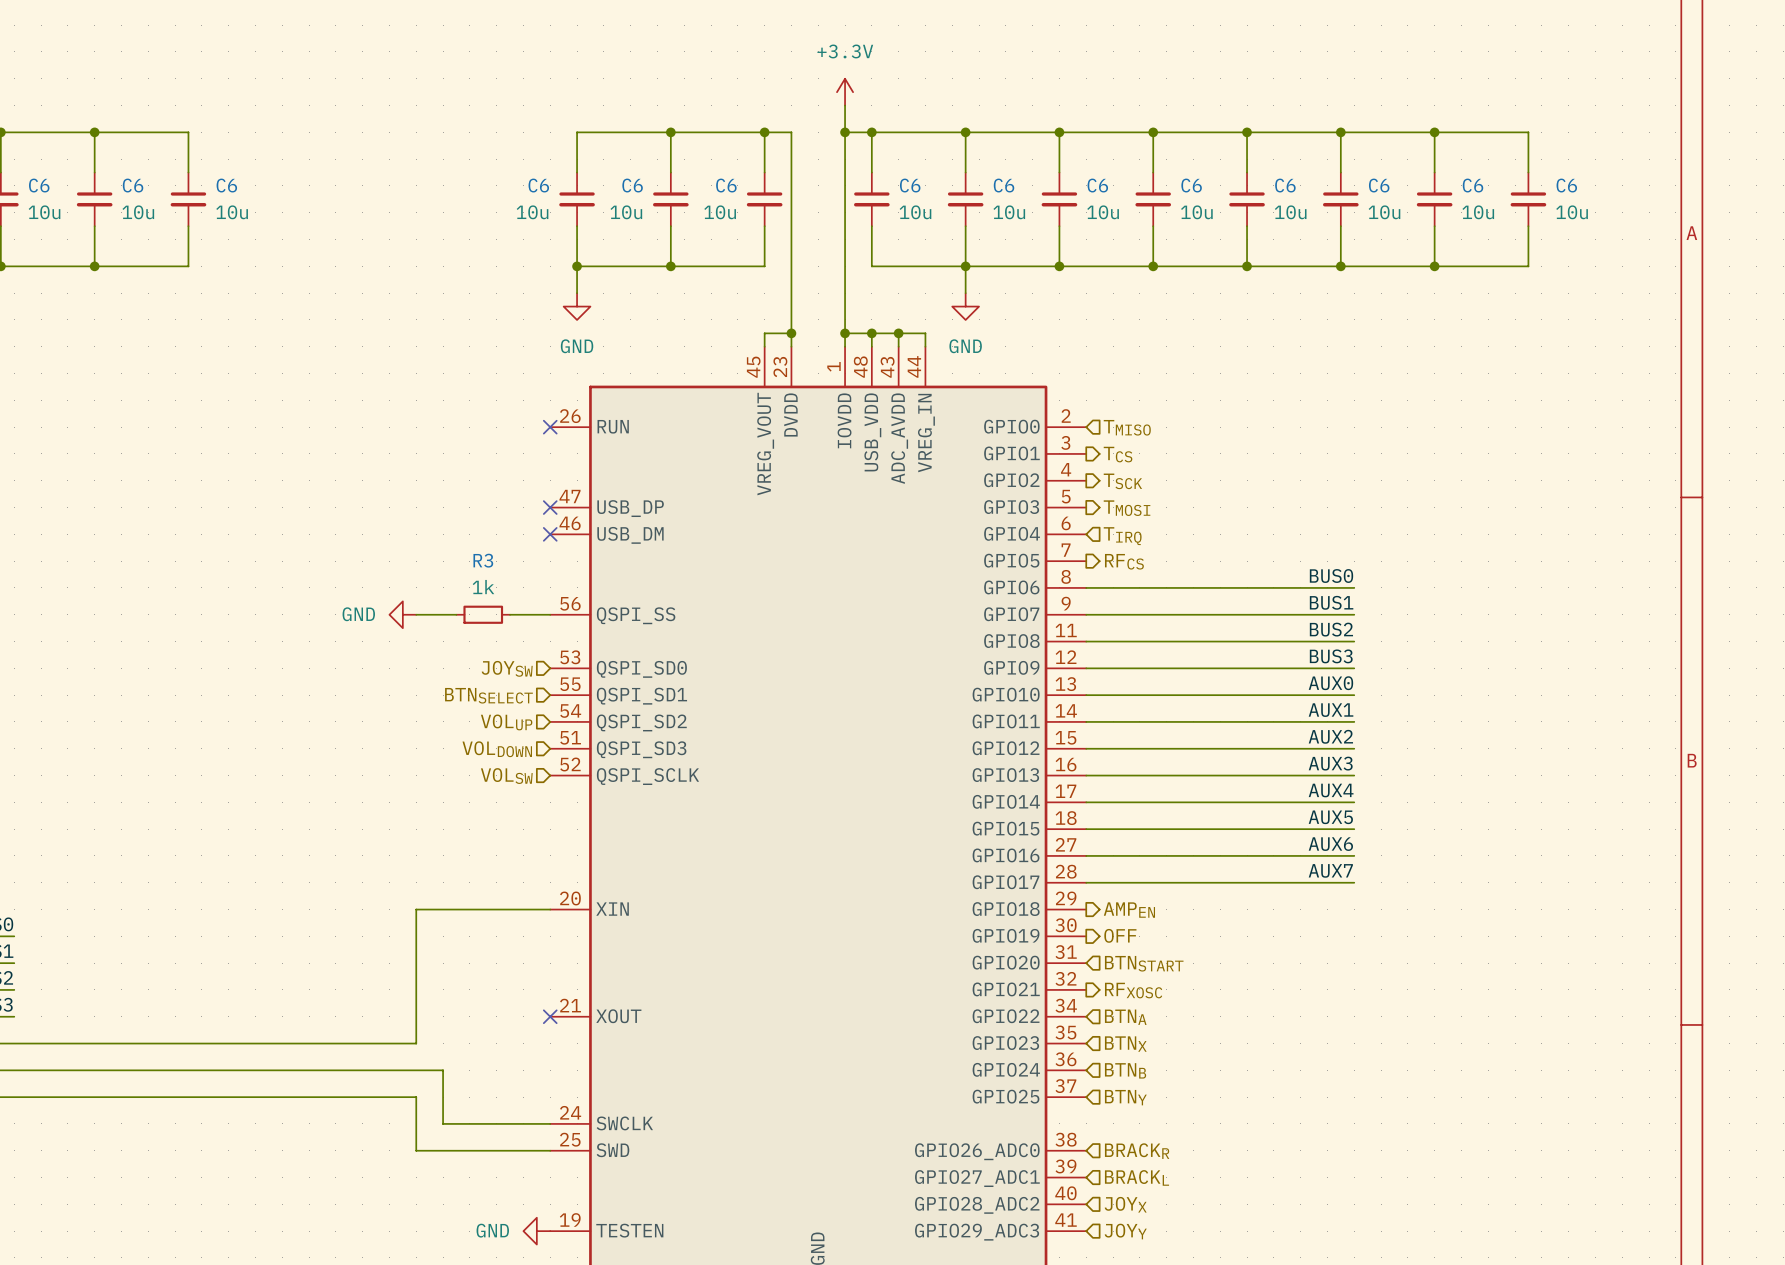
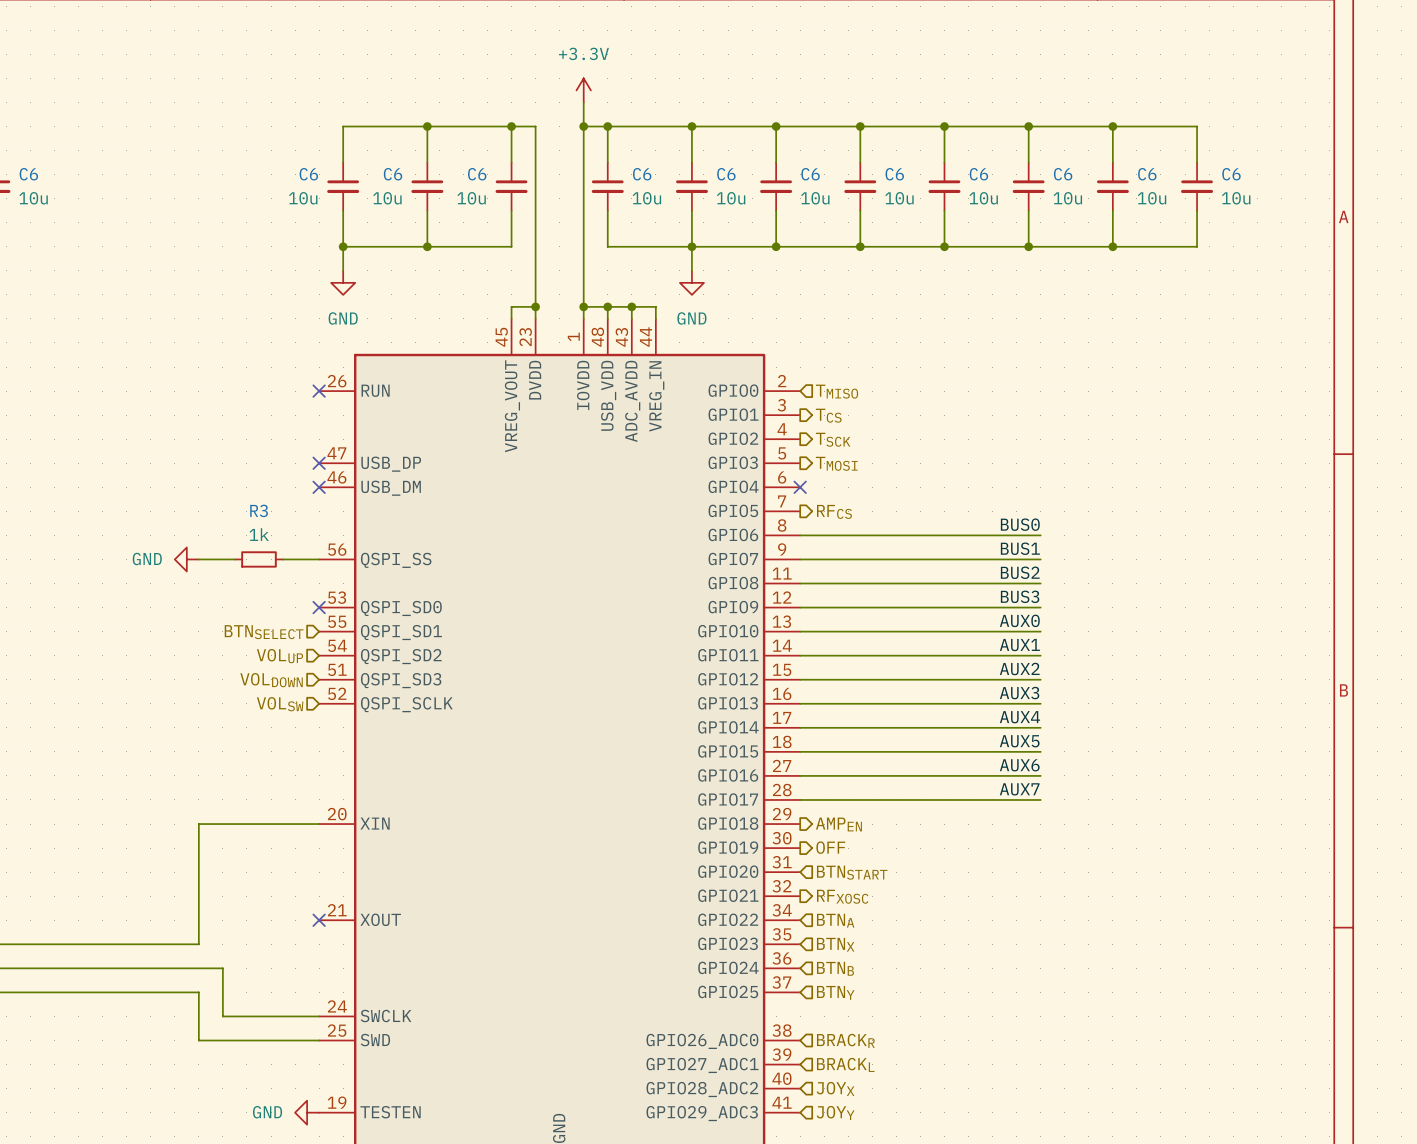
no-connect mark: none -> (800, 487)
hierarchical label: TIRQ (1122, 536) -> none
hierarchical label: JOYSW (507, 668) -> none
no-connect mark: none -> (319, 607)

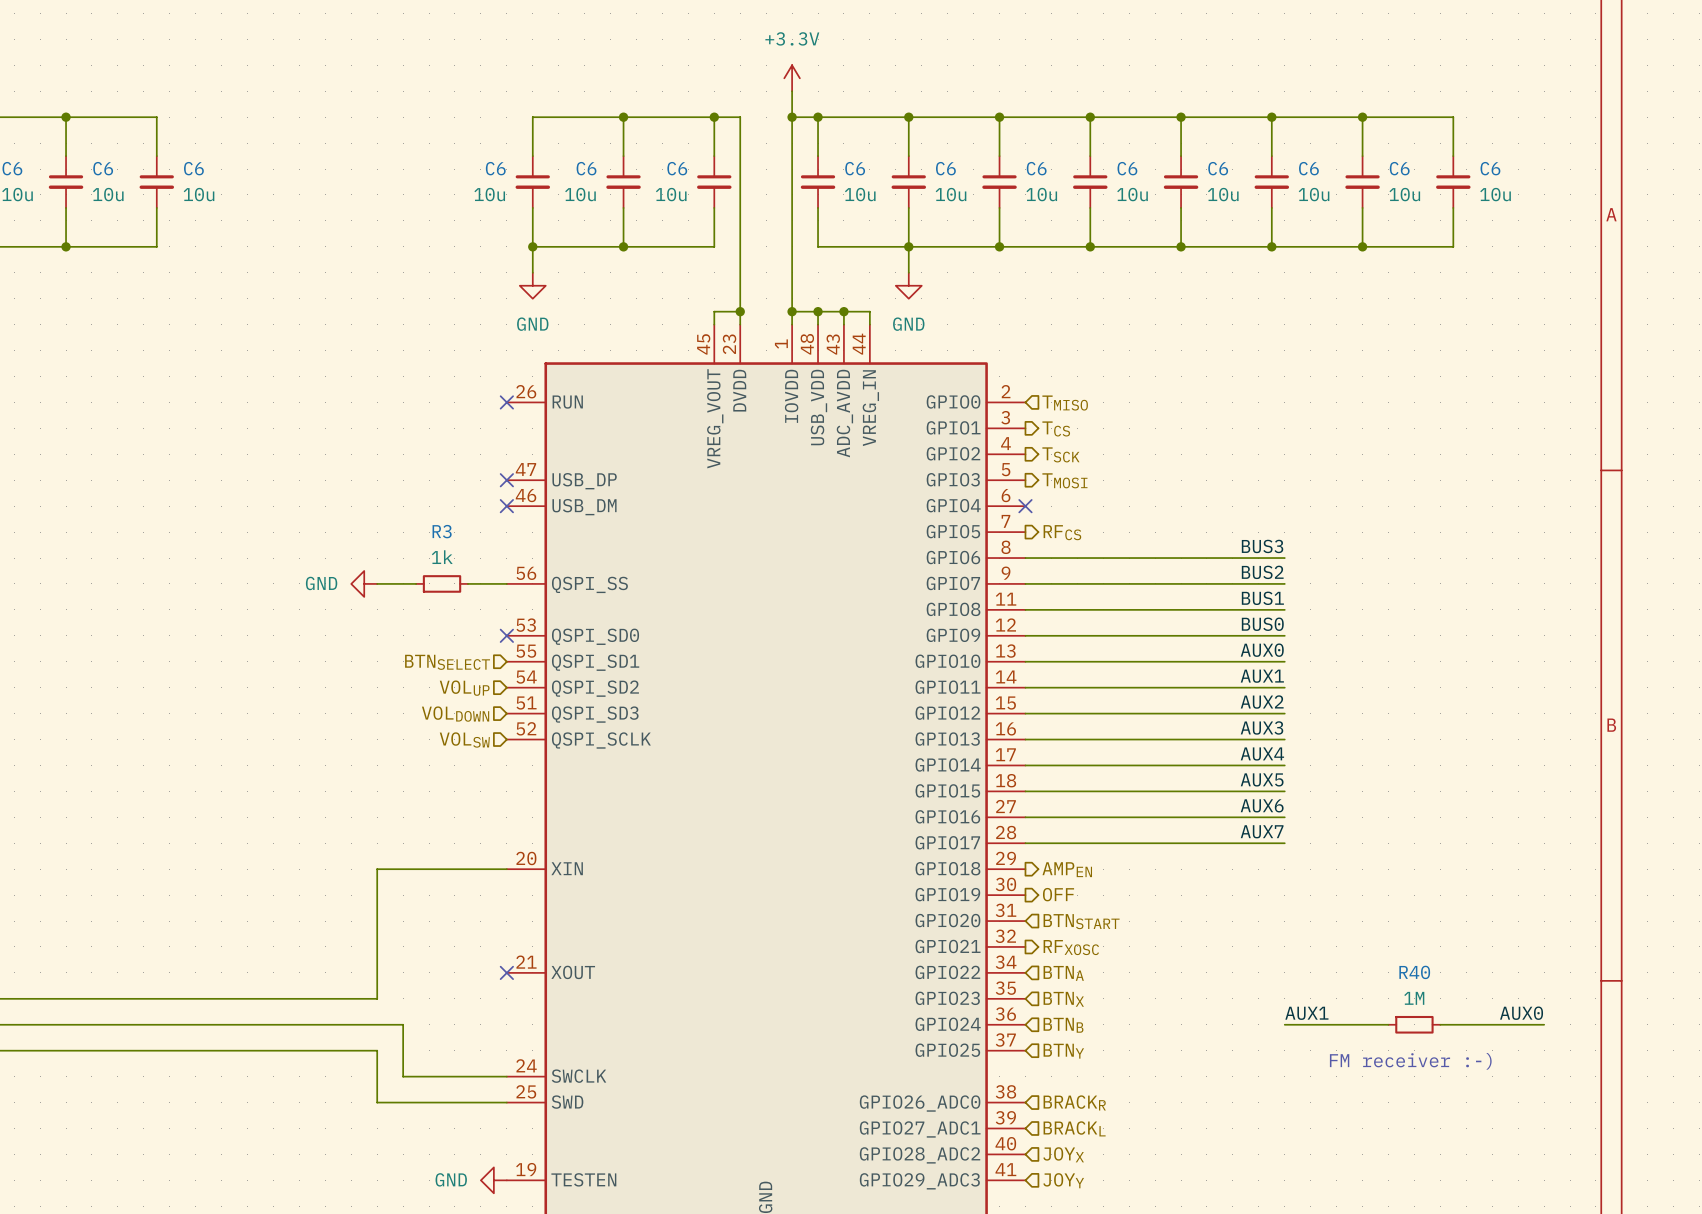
label: BUS0 (1020, 524) -> BUS3 (1262, 546)
label: BUS1 (1020, 548) -> BUS2 (1262, 572)
label: BUS2 (1020, 572) -> BUS1 (1262, 598)
label: BUS3 (1020, 596) -> BUS0 (1262, 624)
label: none -> AUX1 (1306, 1013)
label: none -> AUX0 (1521, 1013)
wire: none -> (1284, 1024) (1388, 1024)
R40: none -> 1M (1414, 1024)
wire: none -> (1440, 1024) (1544, 1024)
text: none -> FM receiver :-) (1410, 1061)

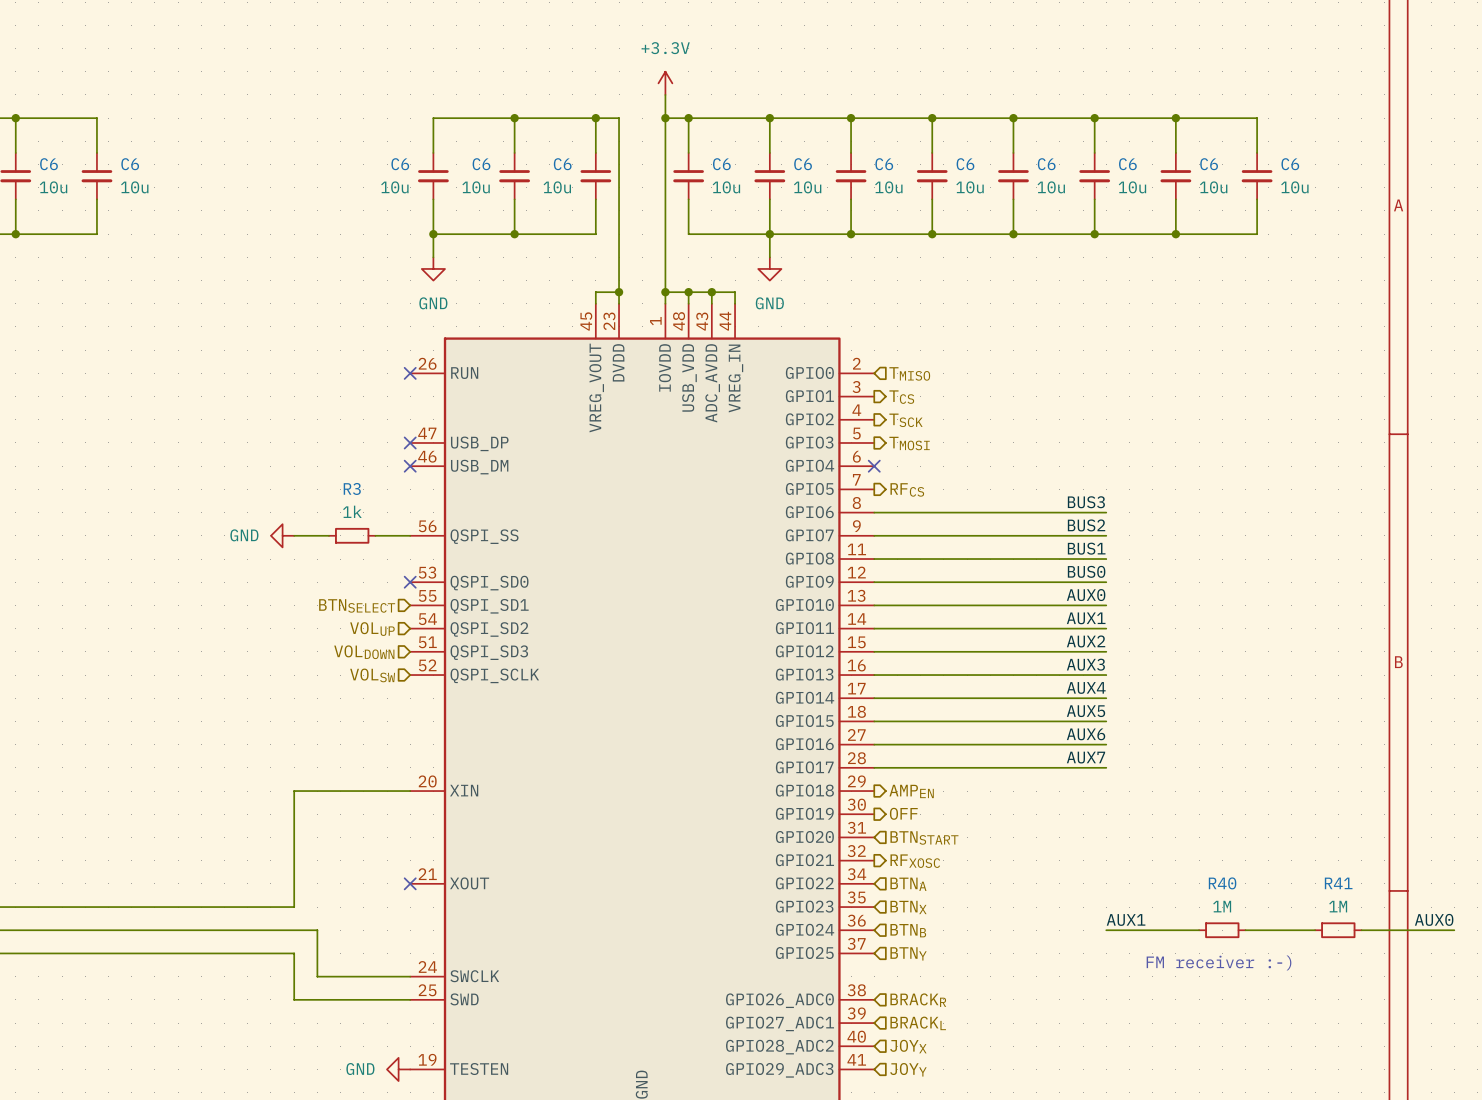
label position: AUX0 (1521, 1013) -> AUX0 (1434, 919)
wire: (1518, 1024) (1544, 1024) -> none
R41: none -> 1M (1338, 930)
wire: none -> (1361, 930) (1454, 930)

